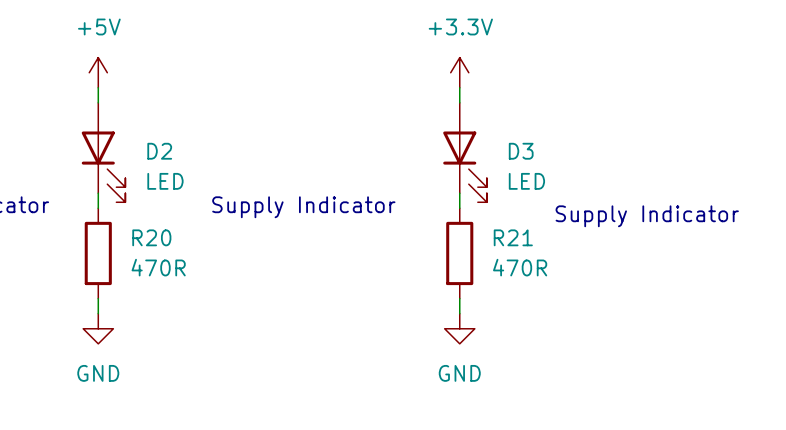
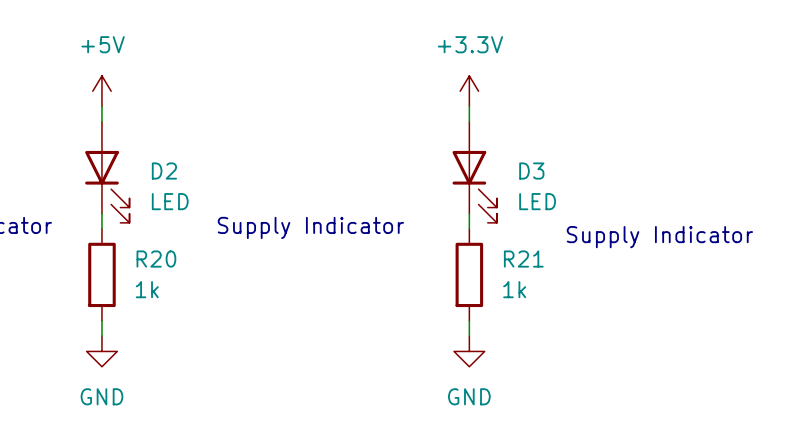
R20 value: 470R (158, 267) -> 1k (147, 289)
R21 value: 470R (520, 267) -> 1k (514, 289)

